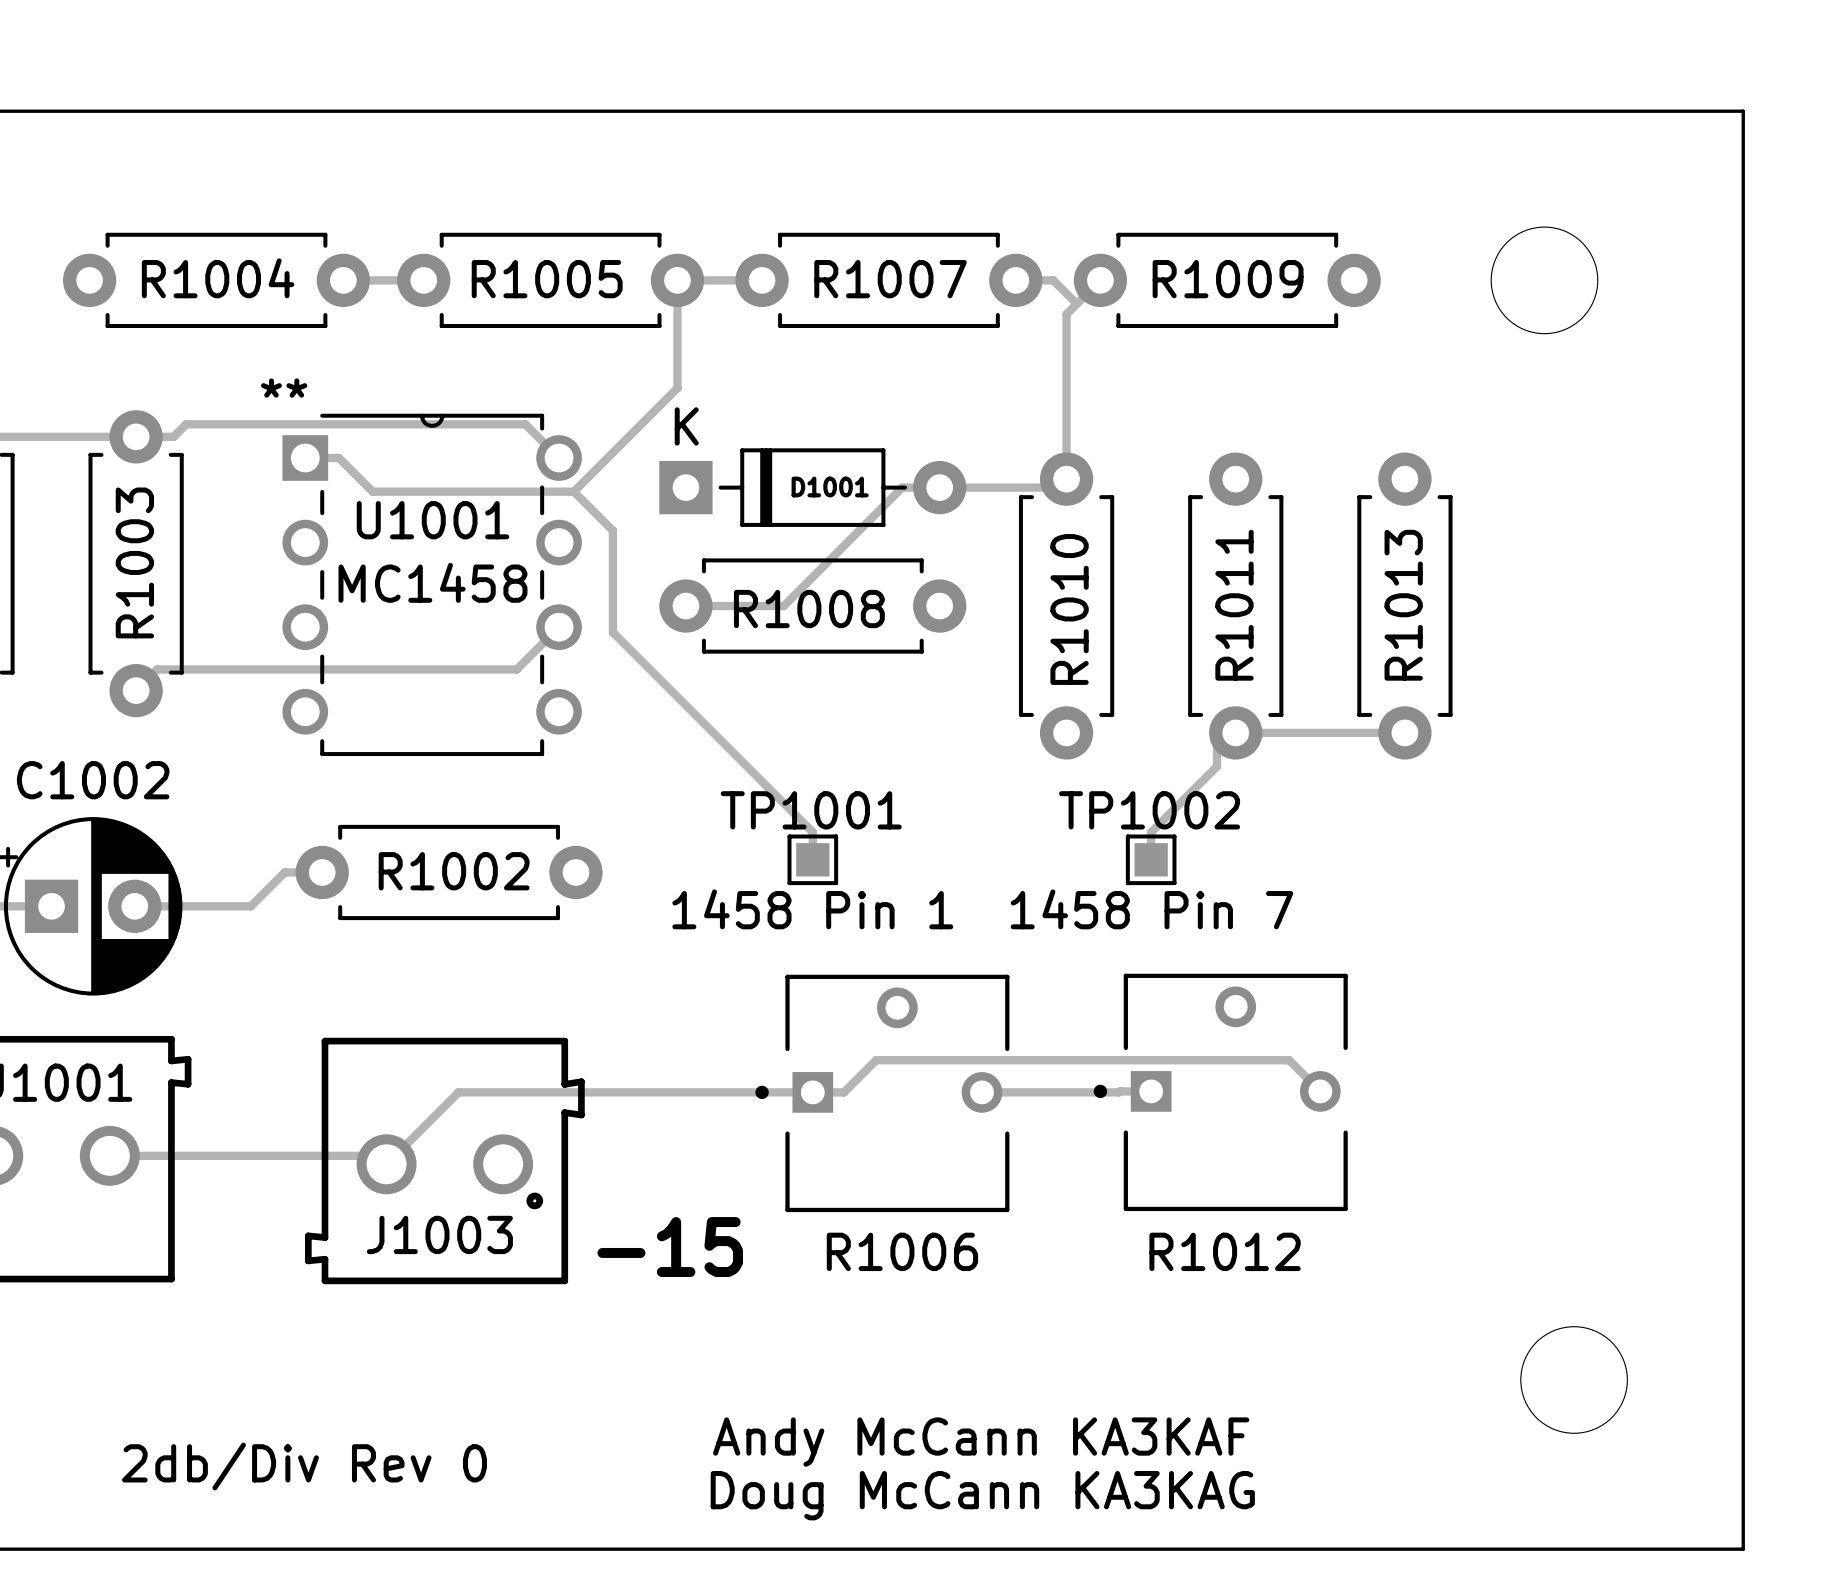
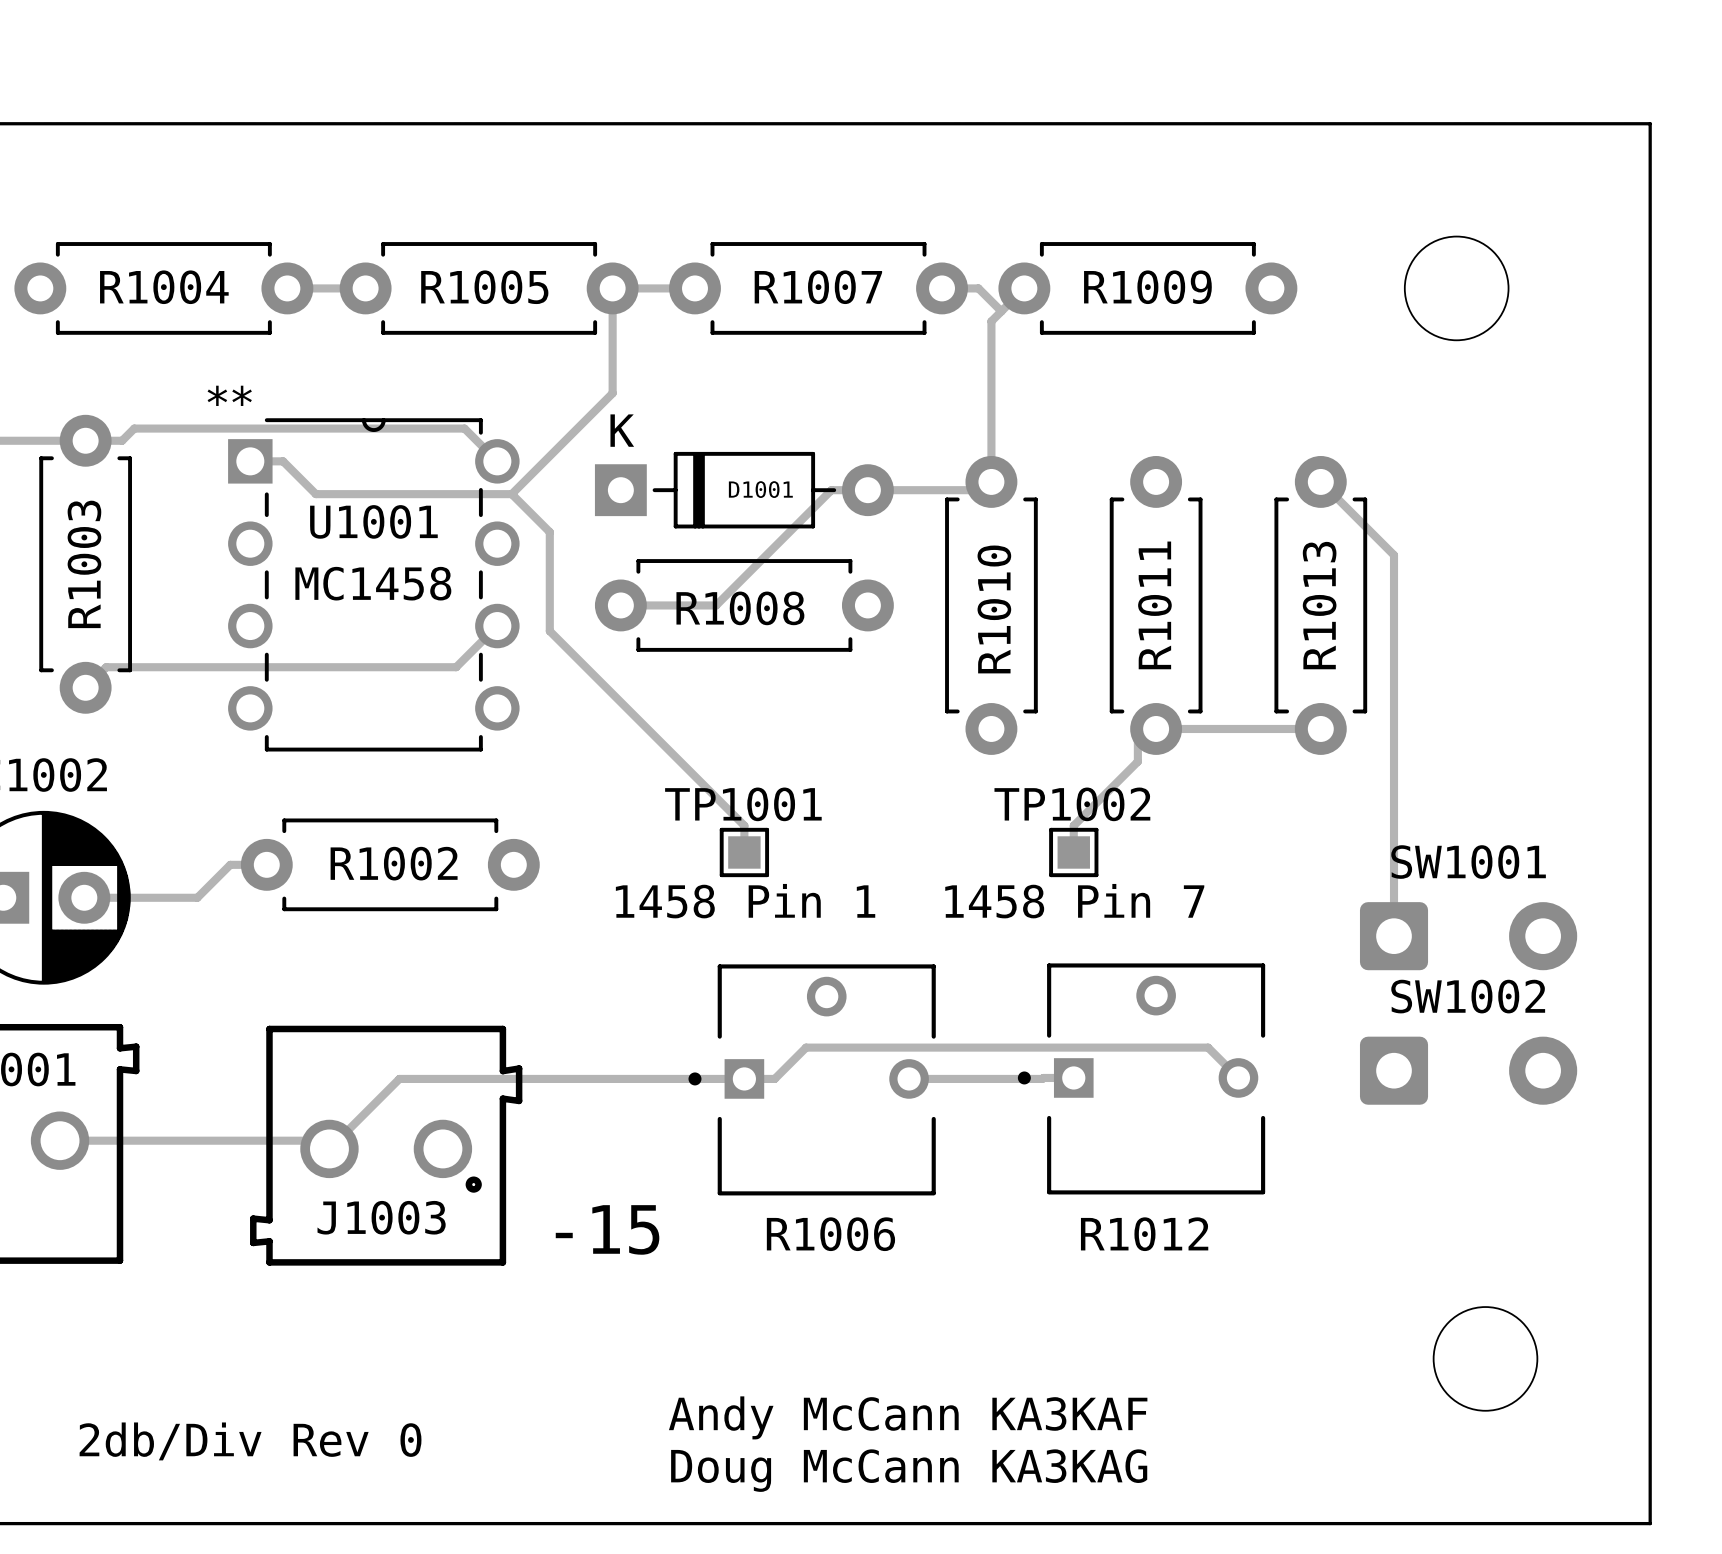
track: none -> (1320, 481) (1394, 555) (1394, 936)
SW1001: none -> (1468, 936)
SW1002: none -> (1468, 1070)

